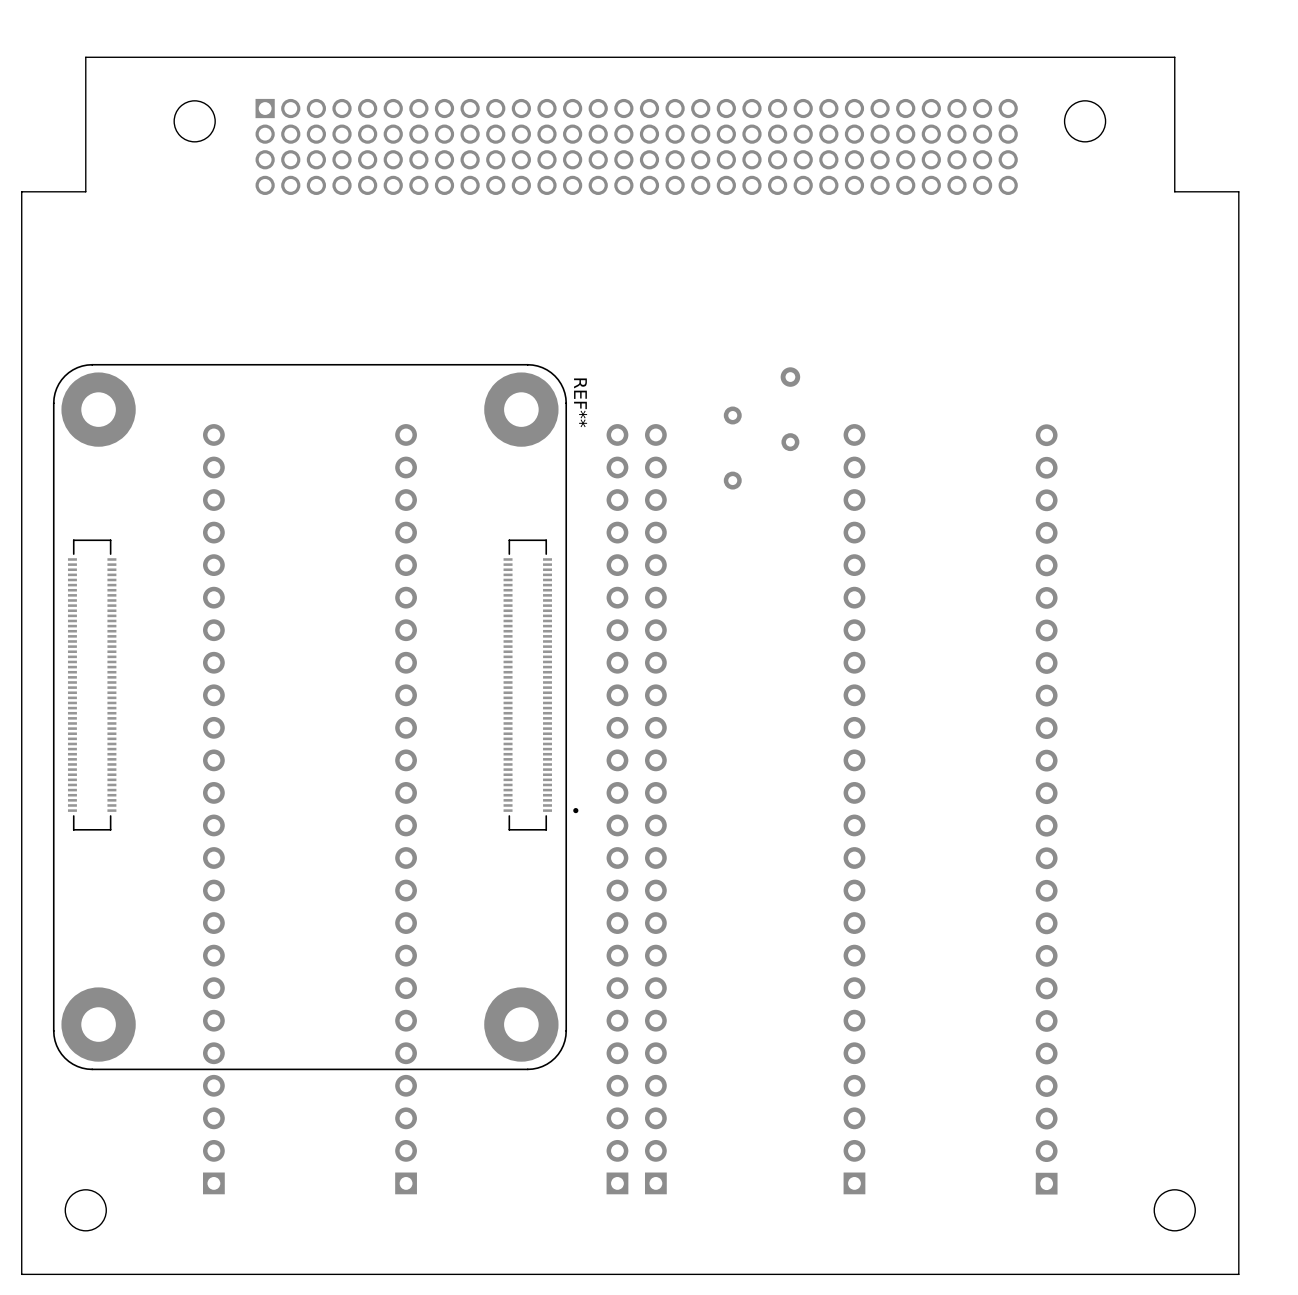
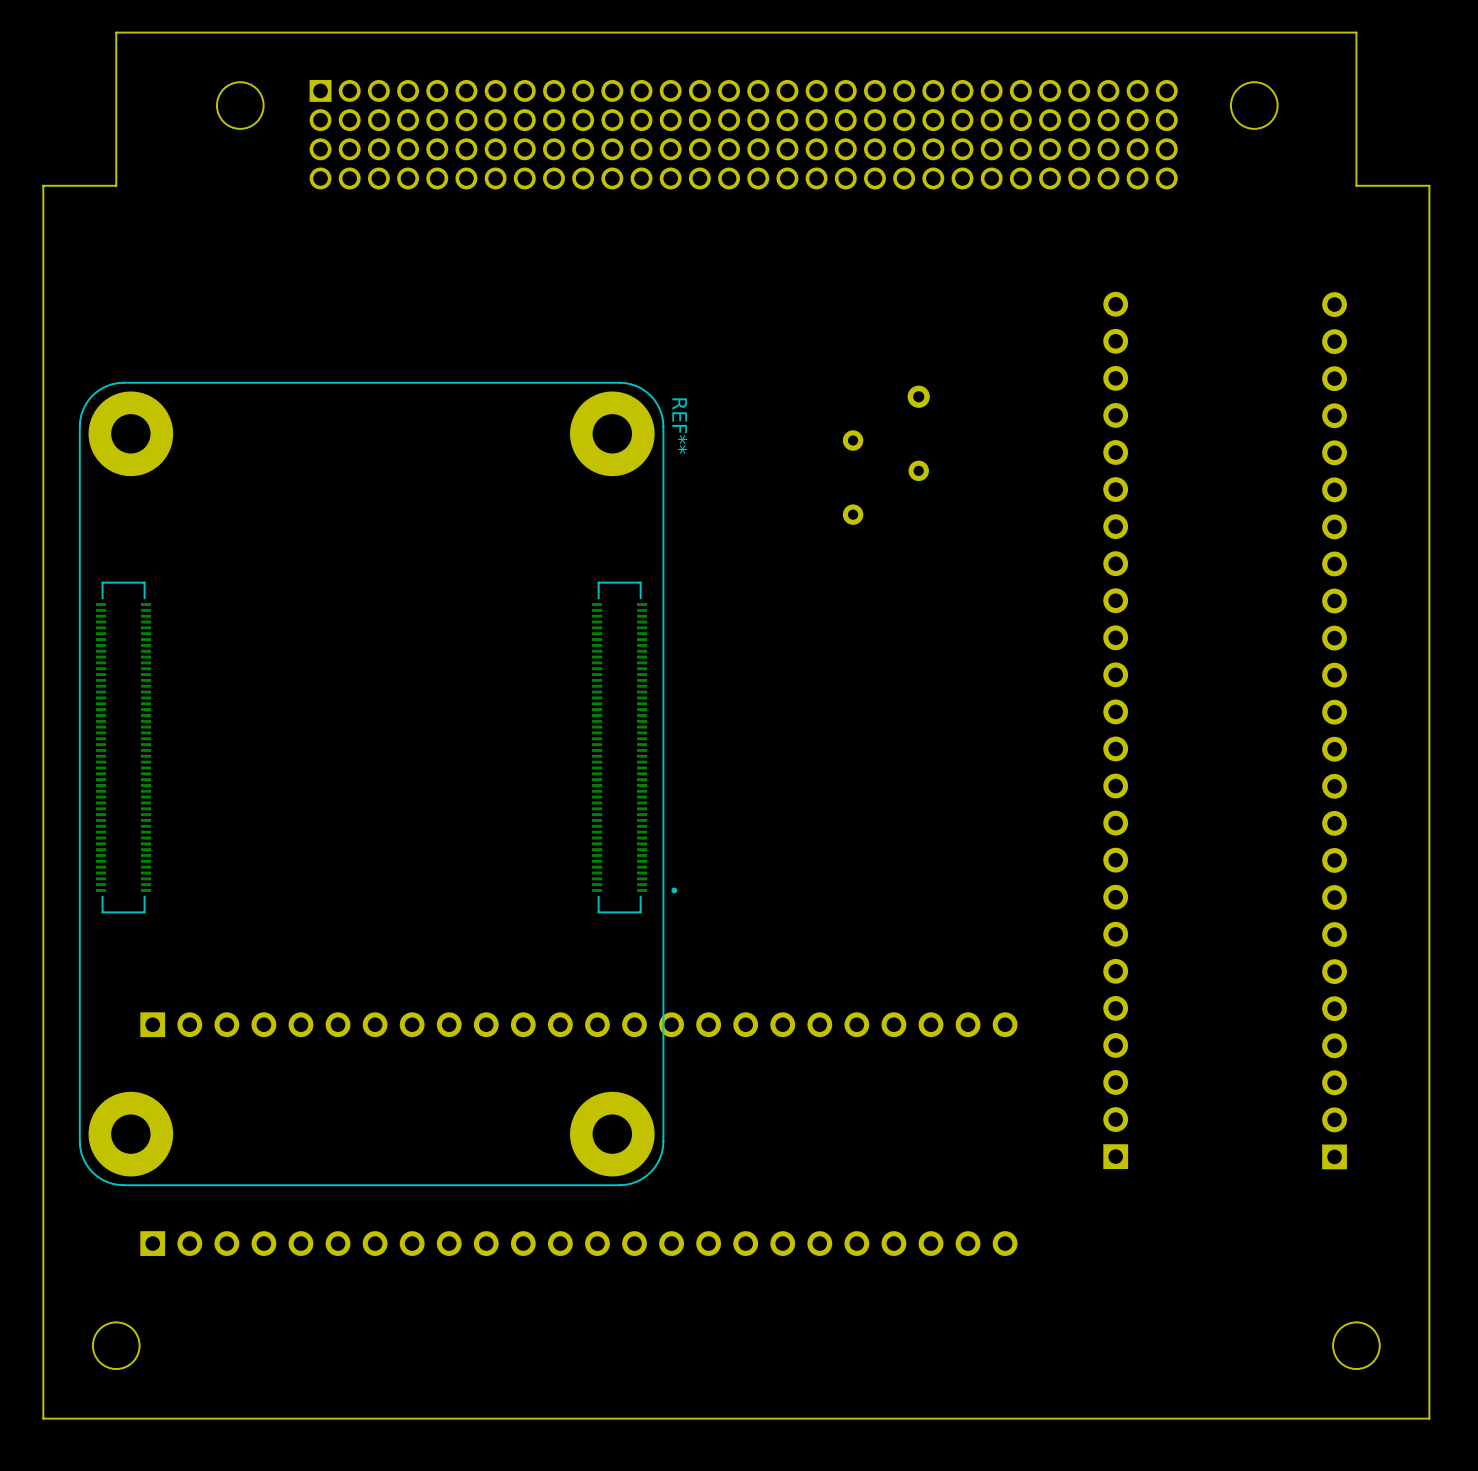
part: none -> (1115, 730)
part: none -> (1334, 730)
part: (213, 809) -> none
part: (406, 809) -> none
part: (617, 809) -> none
part: (655, 809) -> none
part: (854, 809) -> none
part: (1046, 809) -> none
part: none -> (578, 1024)
part: none -> (578, 1243)

